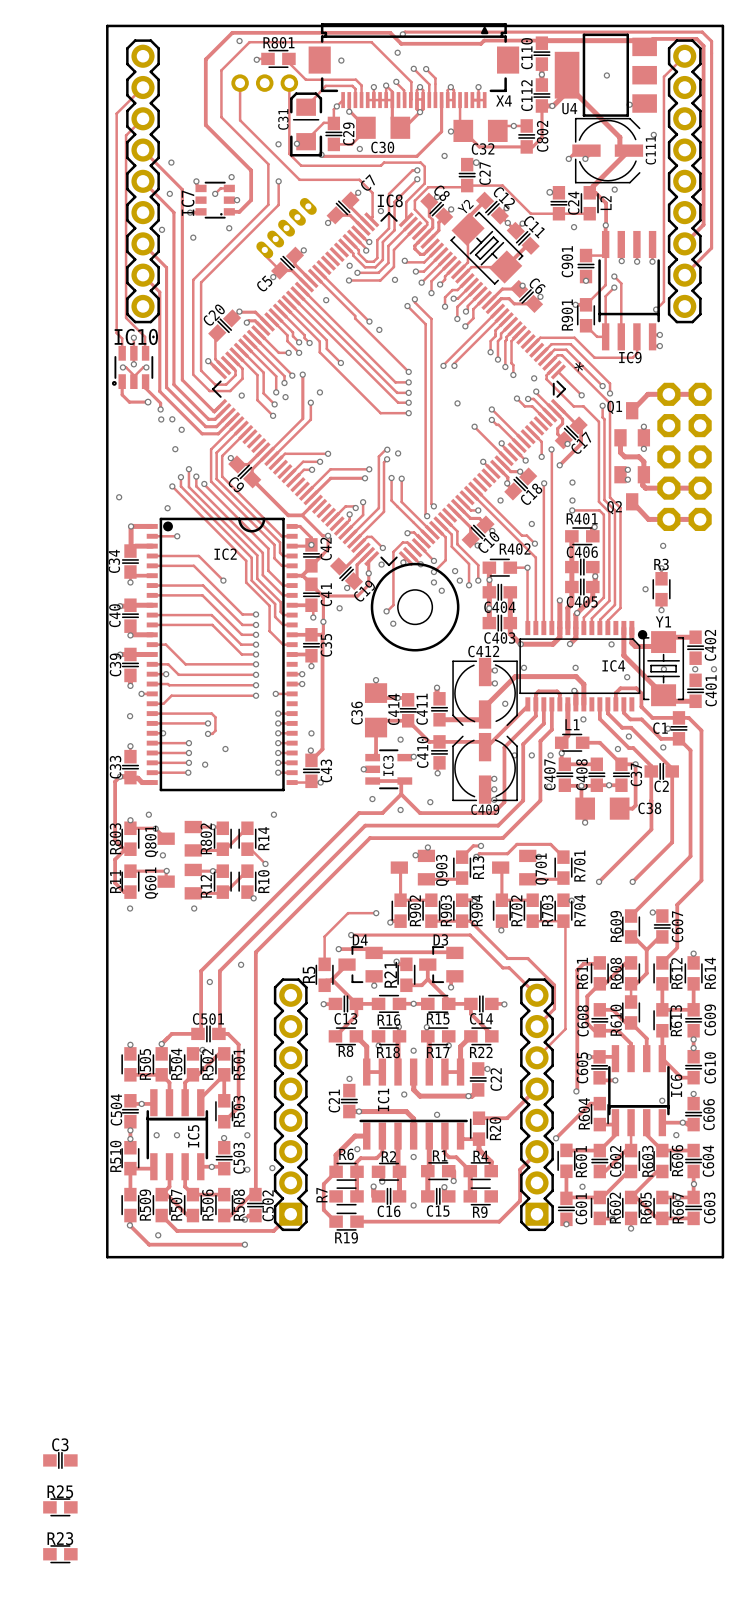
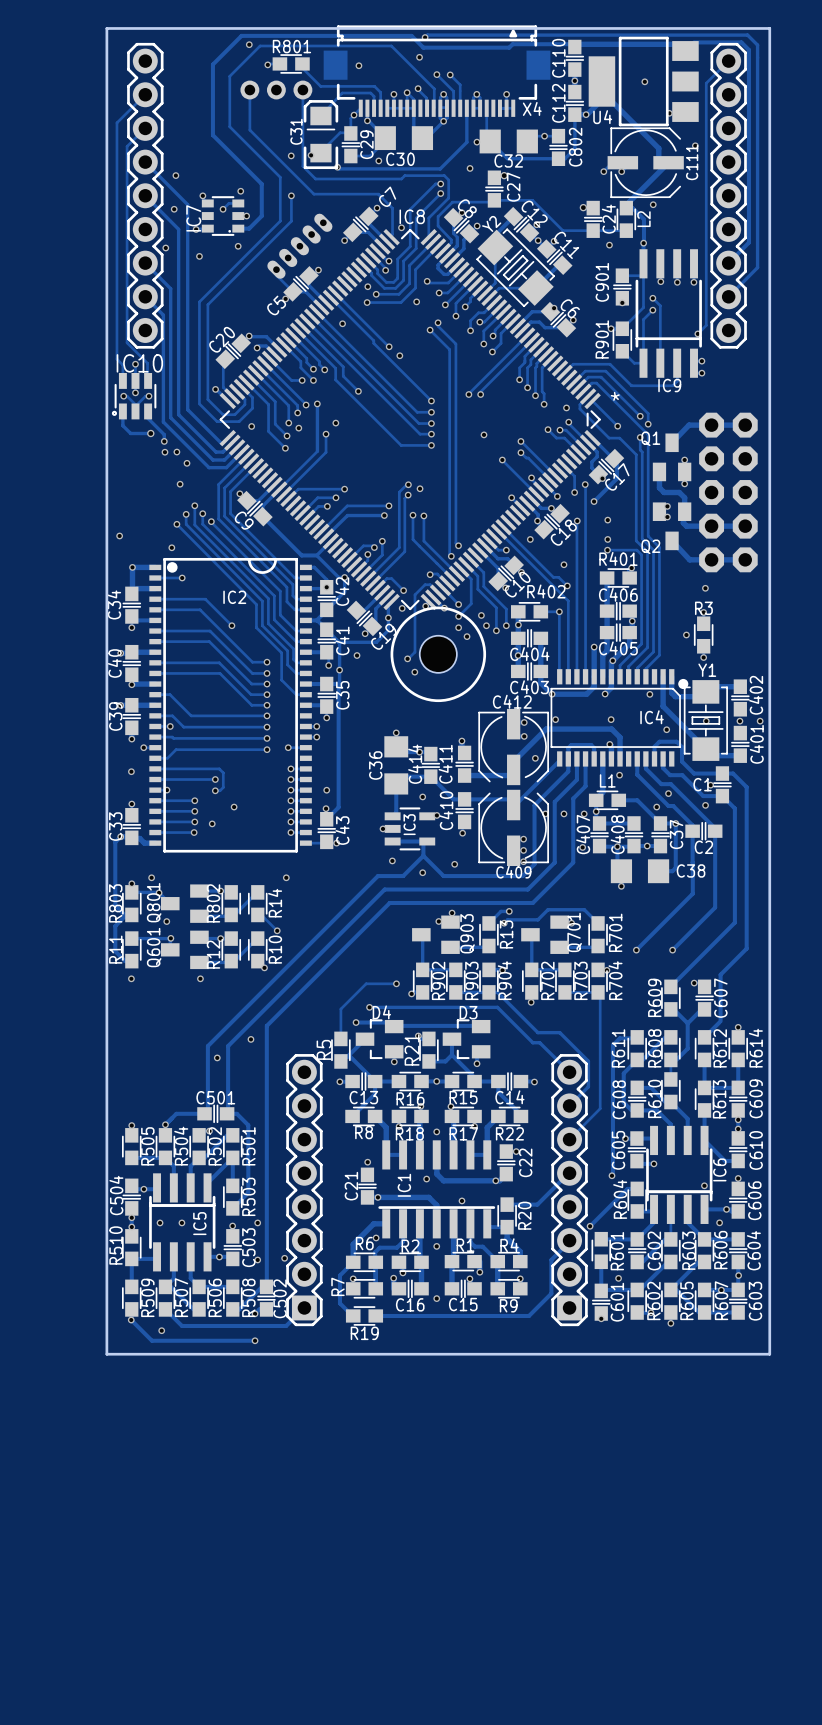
via: none -> (353, 1278)
via: none -> (520, 1278)
C3: (60, 1460) -> none
R25: (60, 1507) -> none
R23: (60, 1554) -> none

